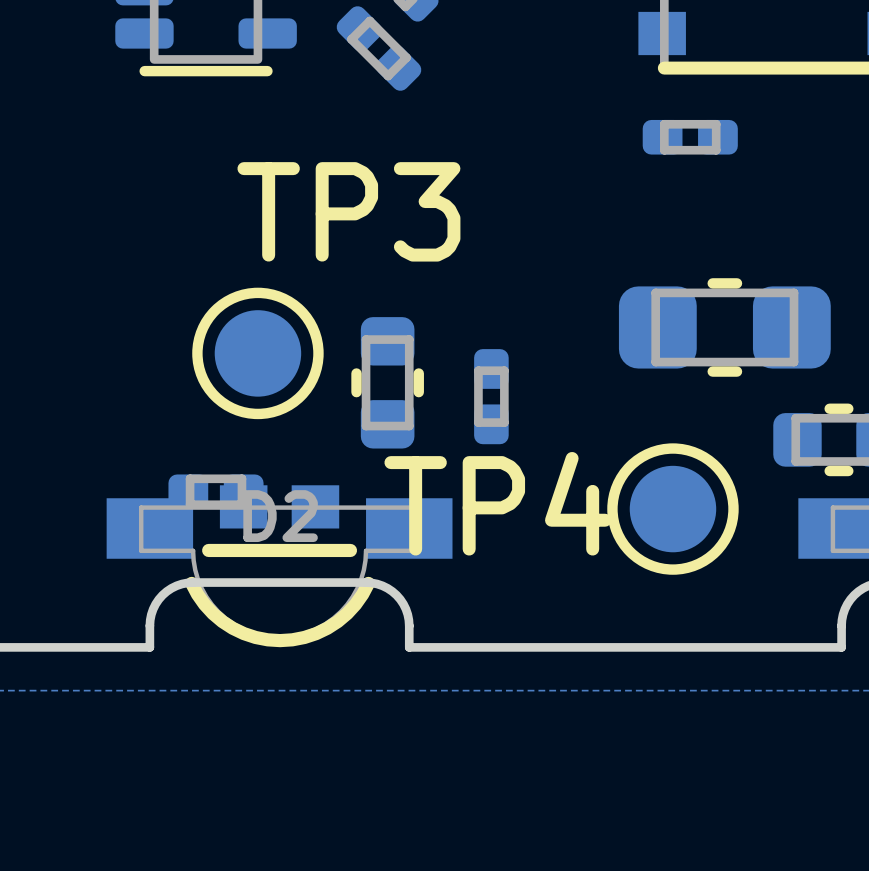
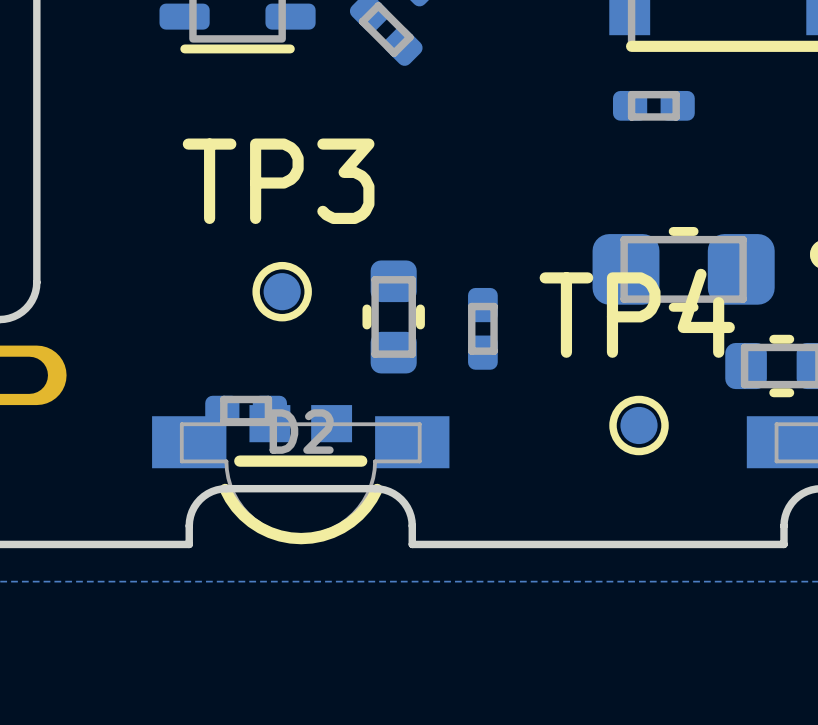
TP3 name position: TP3 (348, 211) -> TP3 (278, 181)
TP3 footprint: [192, 287, 324, 420] -> [252, 261, 312, 322]
TP4 footprint: [607, 443, 739, 575] -> [609, 395, 669, 456]
TP4 name position: TP4 (497, 503) -> TP4 (637, 313)

